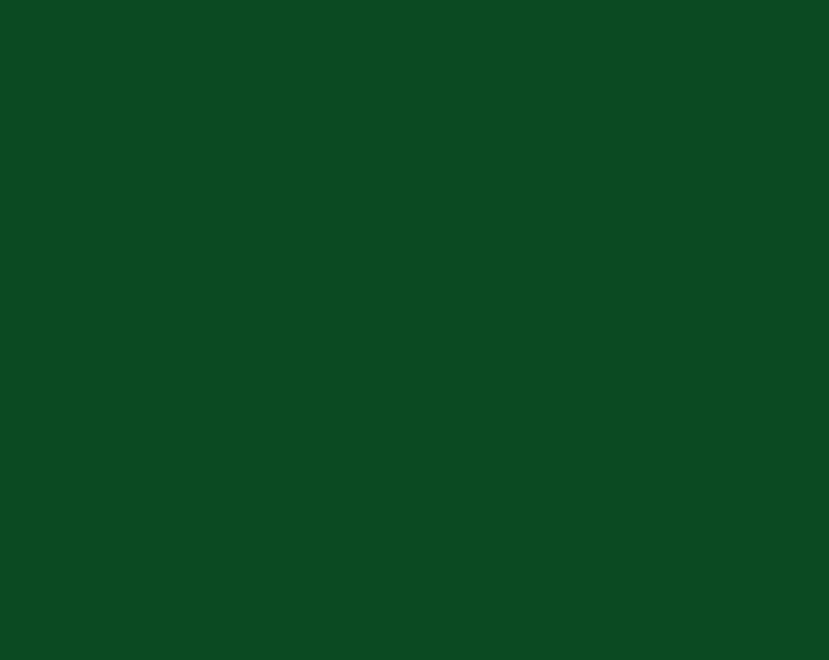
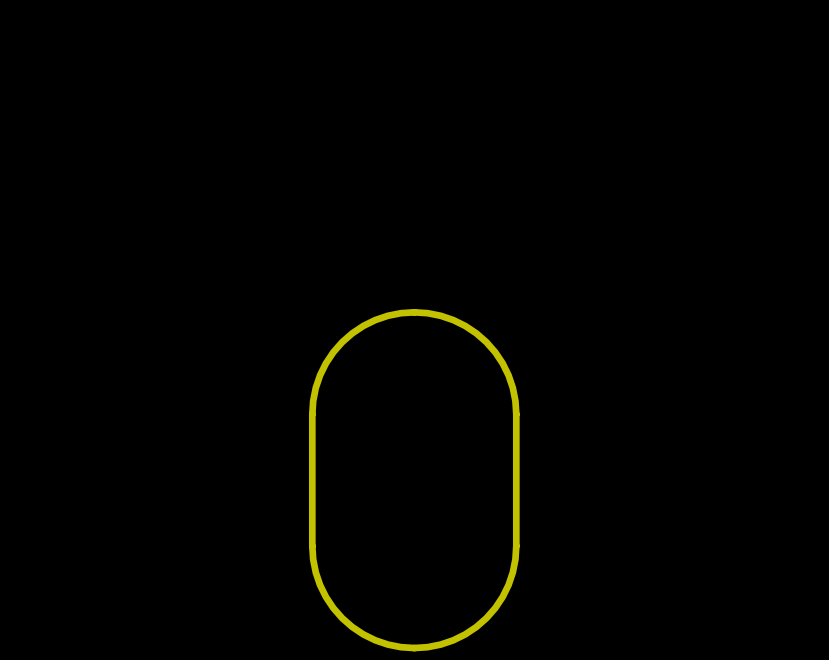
board edge: none -> (414, 312) (400, 313) (375, 320) (352, 333) (342, 342) (325, 363) (320, 375) (313, 400) (312, 414) (312, 546) (313, 559) (320, 585) (333, 608) (352, 626) (375, 640) (400, 647) (414, 648) (427, 647) (453, 640) (476, 626) (486, 618) (502, 597) (508, 585) (515, 559) (516, 546) (516, 414) (515, 400) (508, 375) (495, 352) (476, 333) (453, 320) (427, 313) (414, 312)

